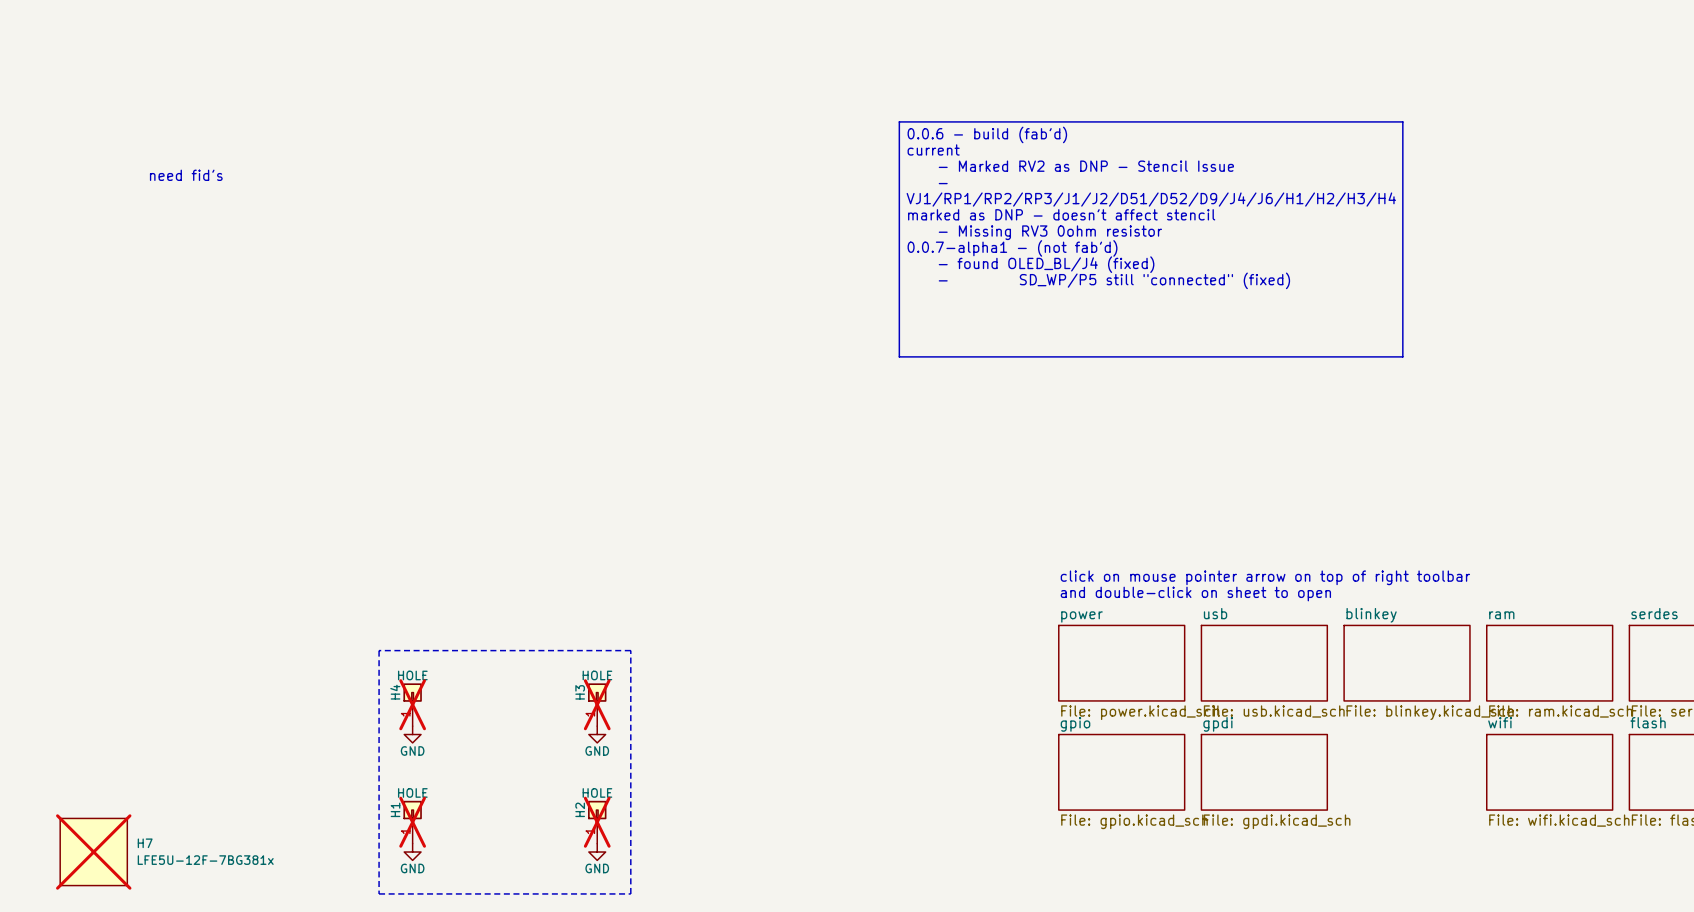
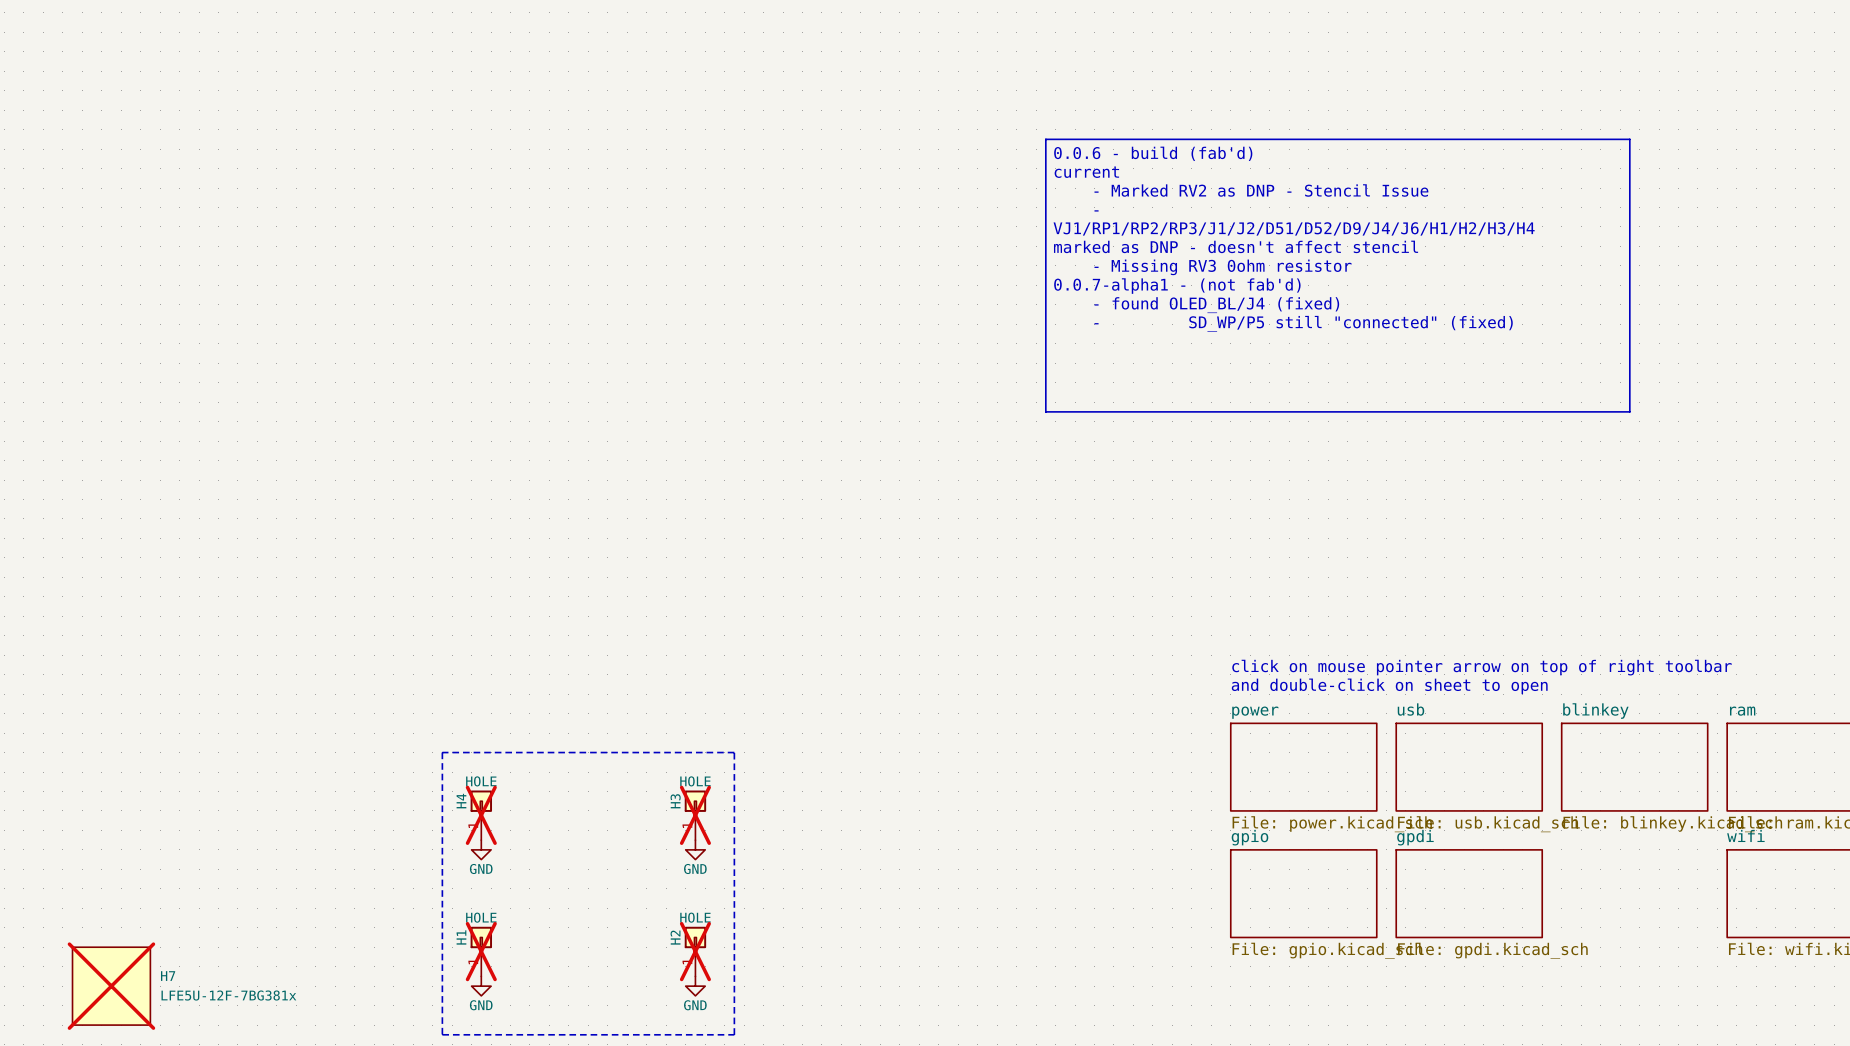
text: need fid's (186, 175) -> none

